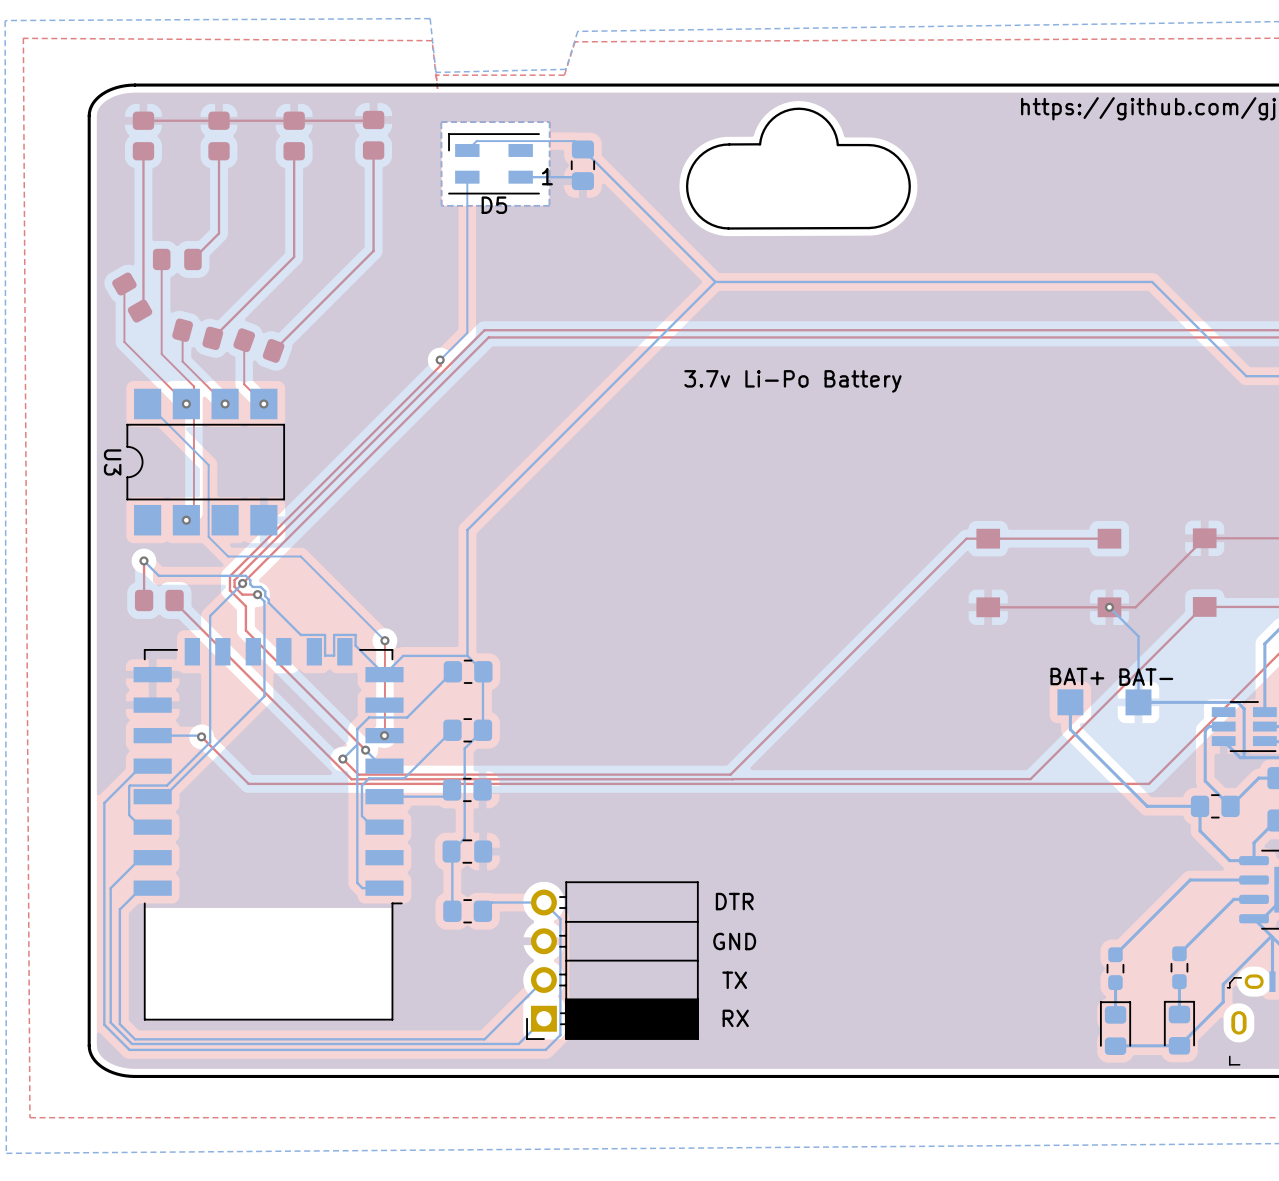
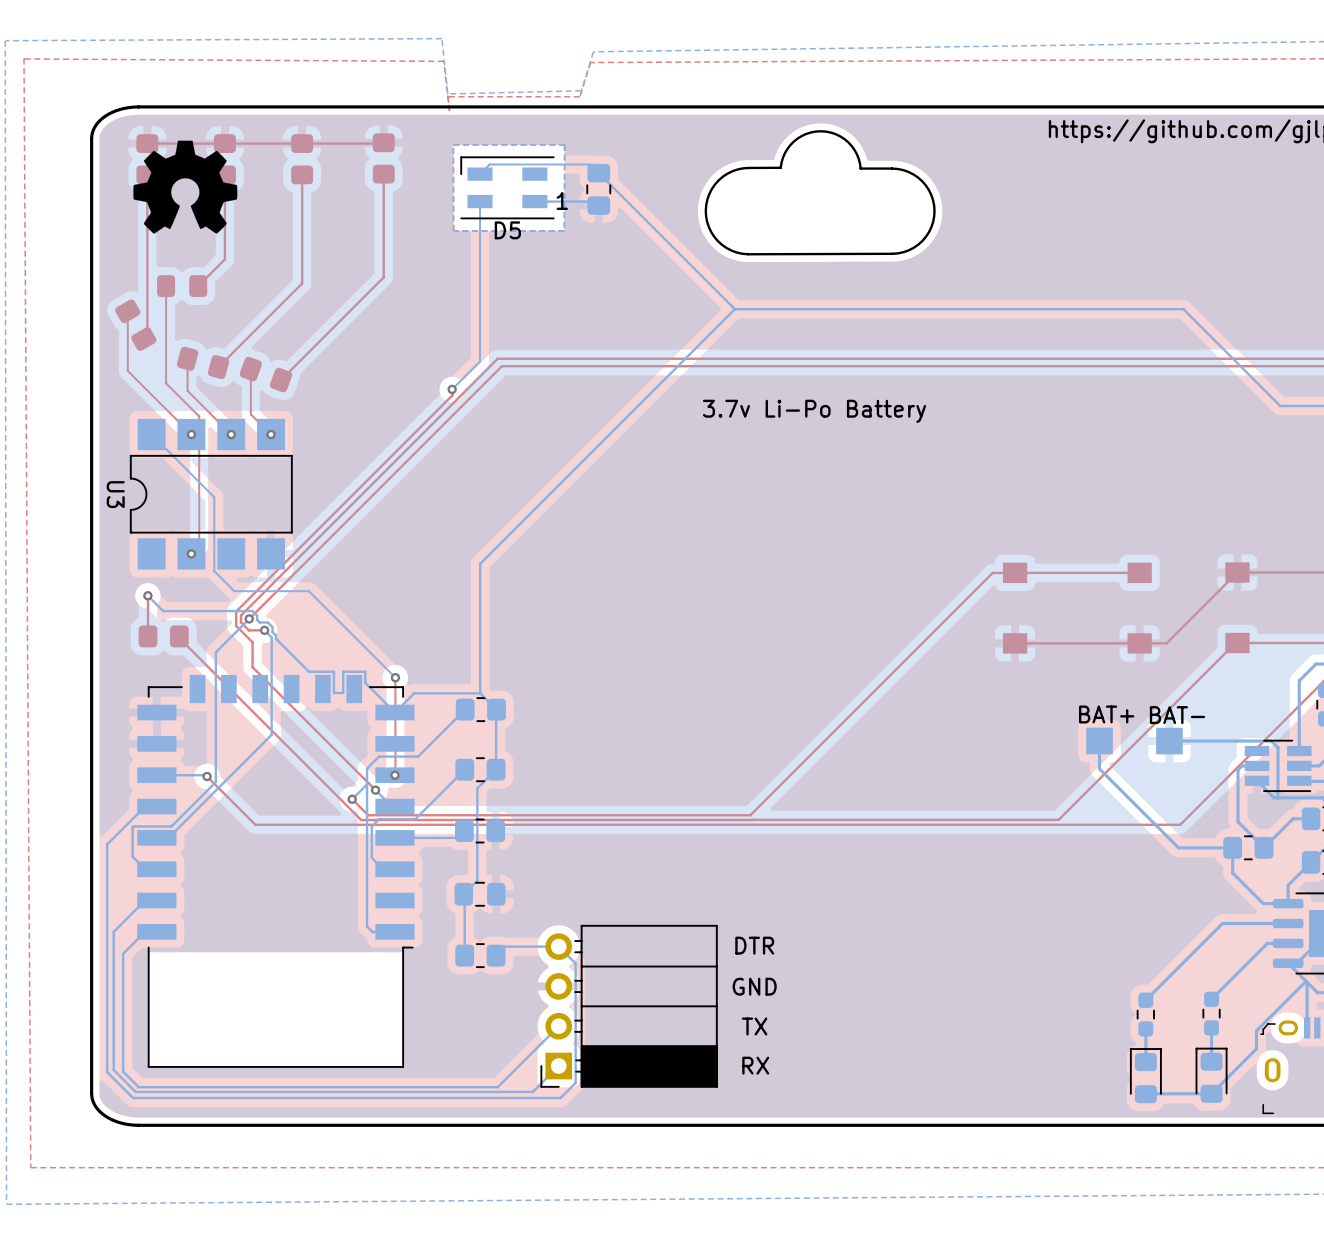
drawing: none -> [133, 140, 238, 234]
bottom track: (1109, 607) (1138, 636) (1138, 702) -> none
via: (1109, 607) -> none

